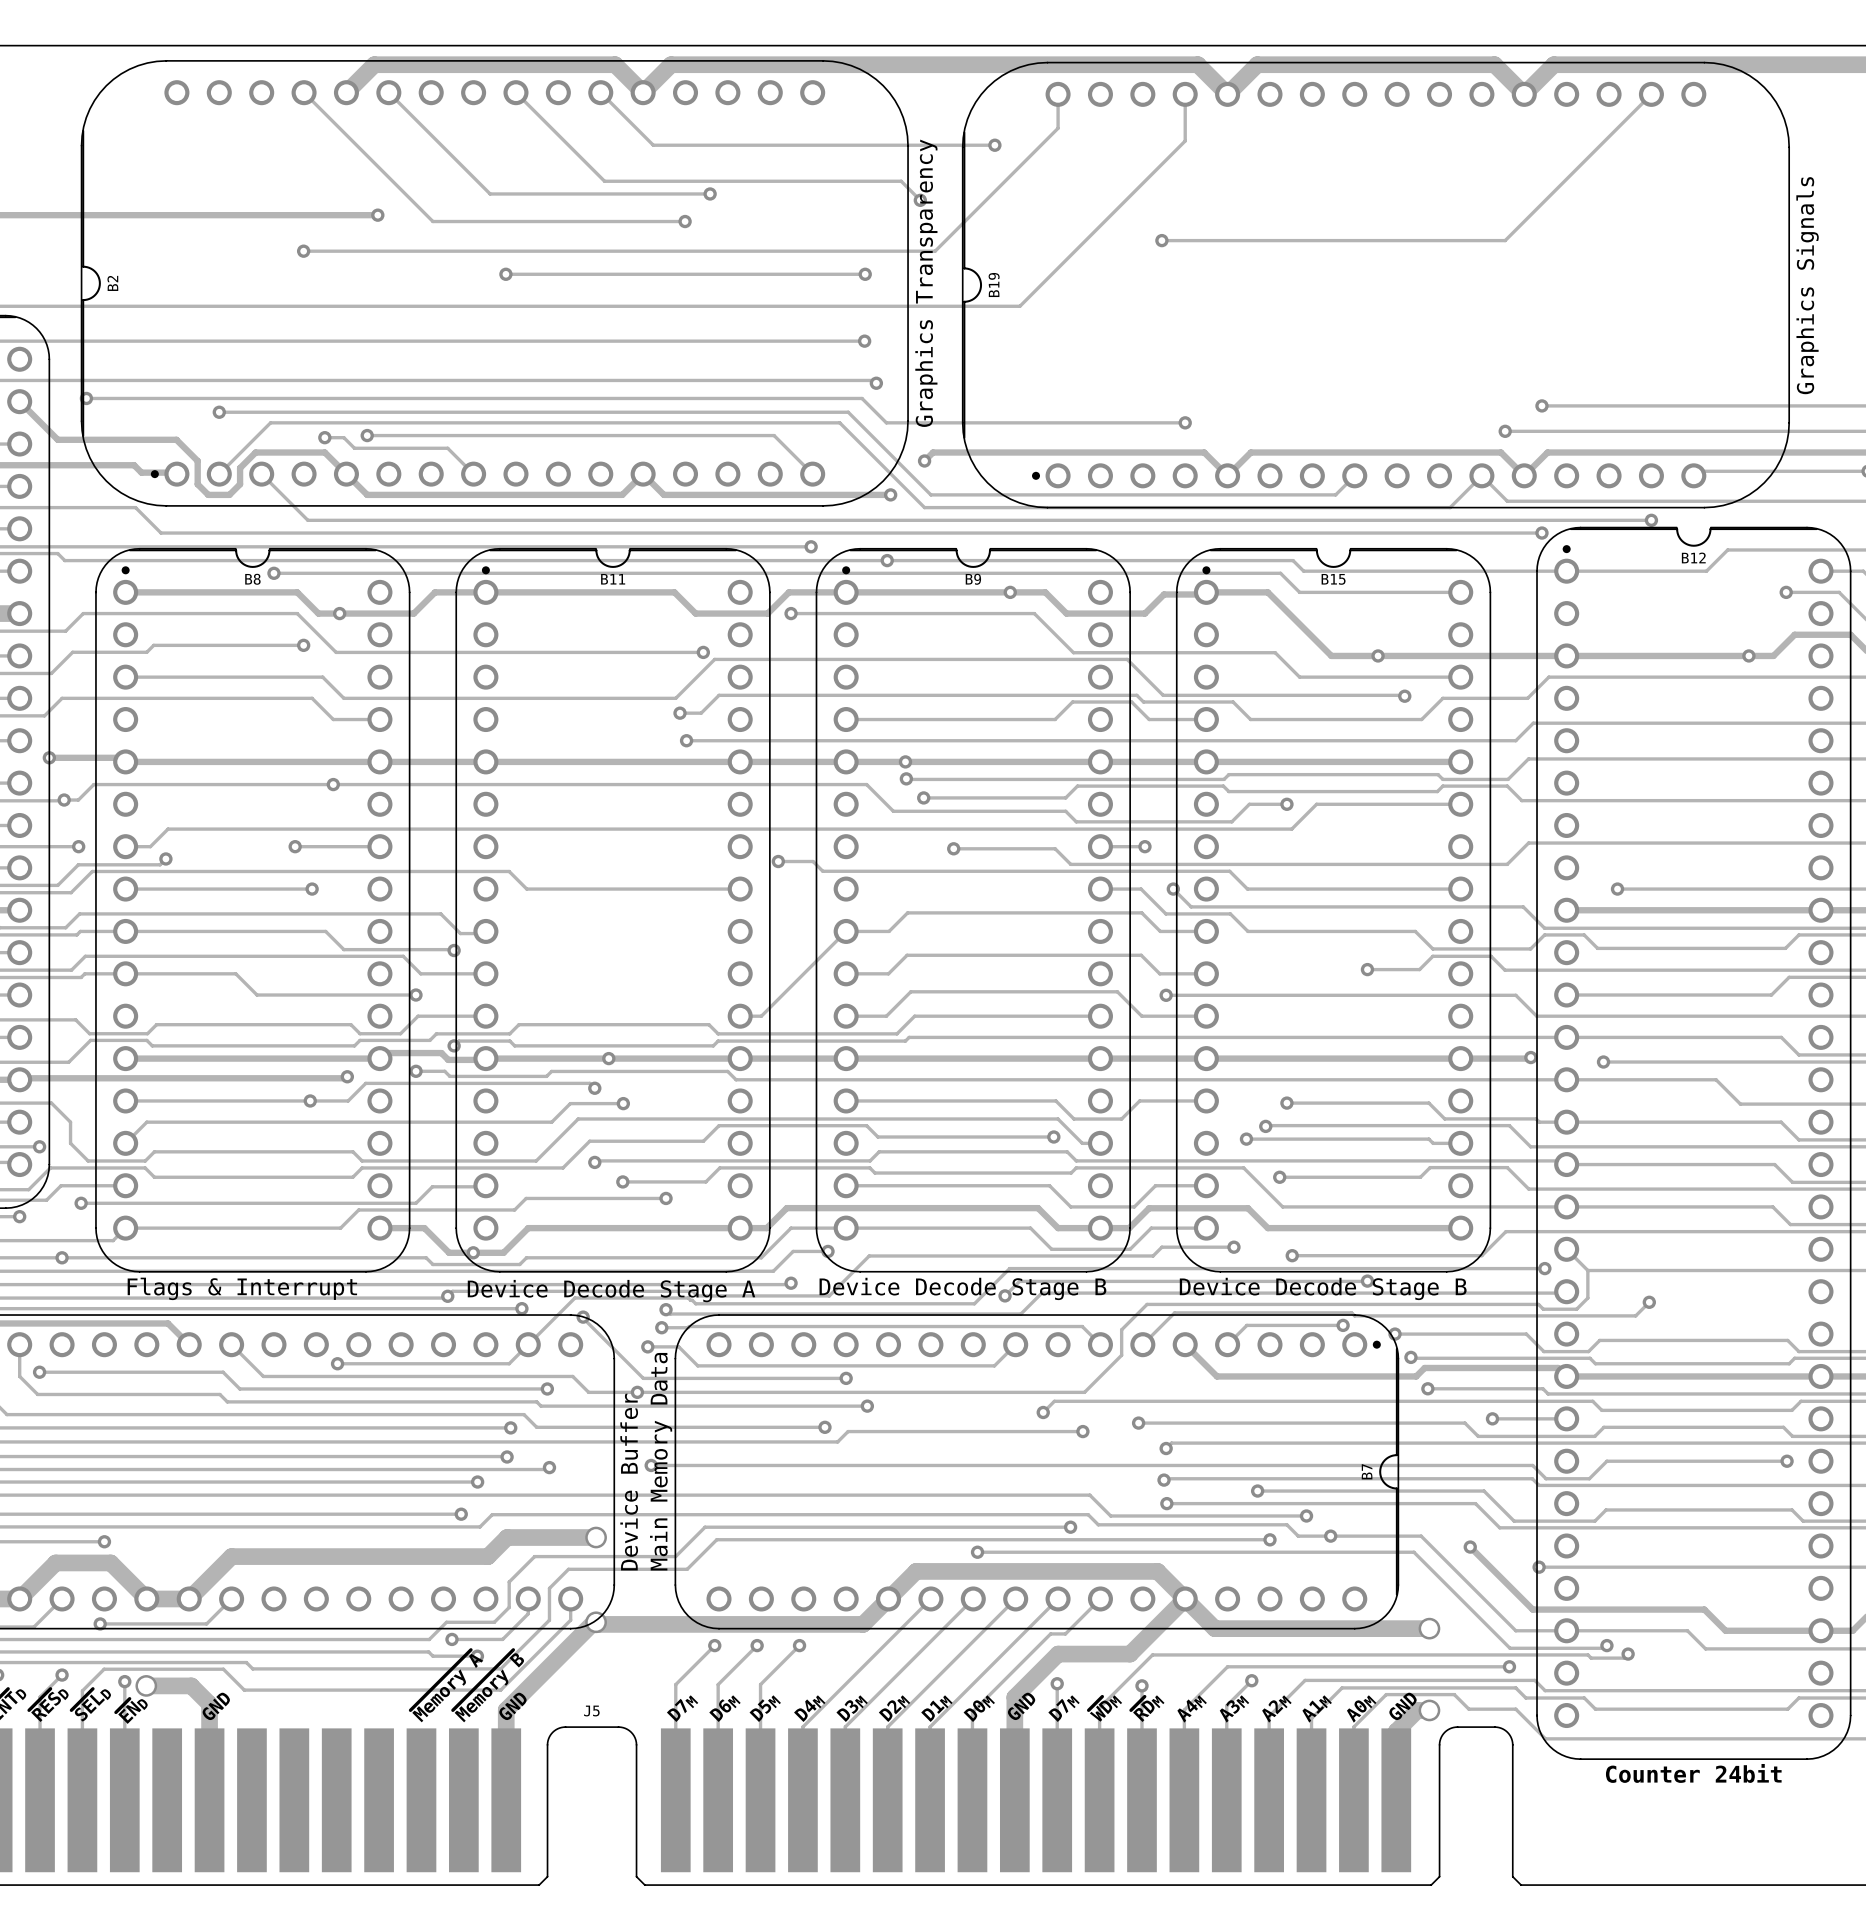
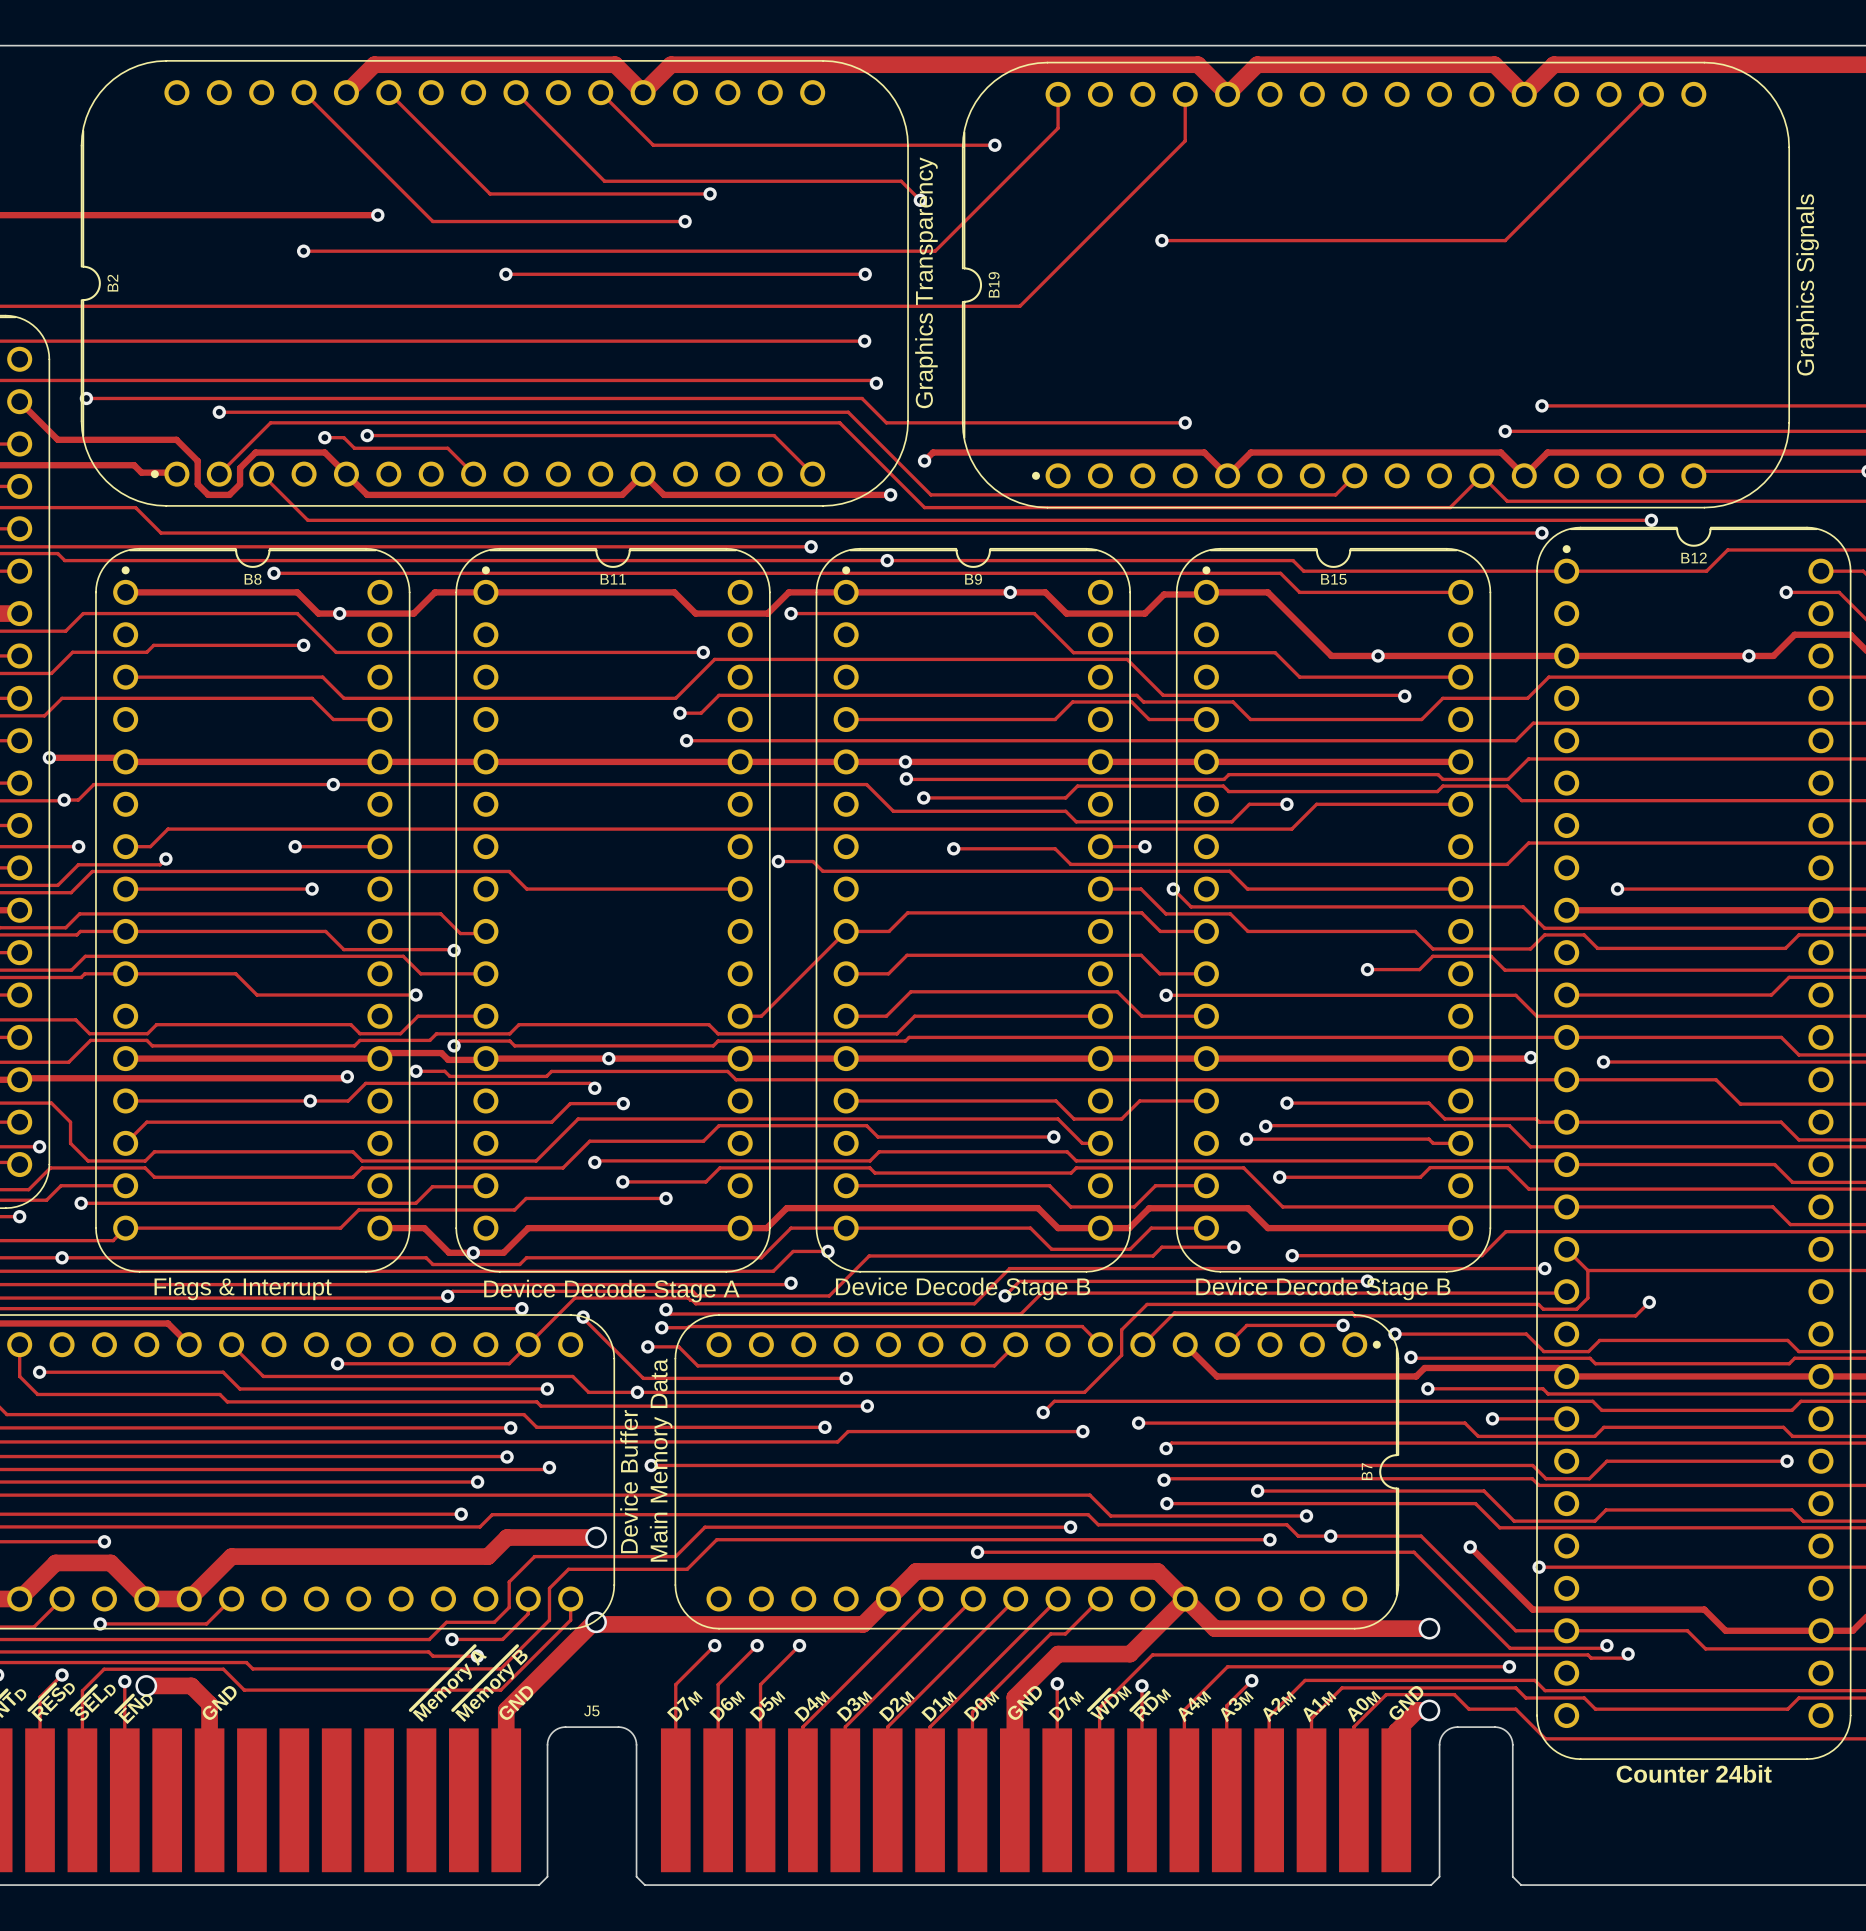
B2 footprint: [80, 60, 909, 507] -> [80, 60, 909, 507]
B19 footprint: [961, 61, 1791, 509] -> [961, 61, 1791, 509]
B7 footprint: [674, 1314, 1400, 1630] -> [674, 1314, 1400, 1630]

